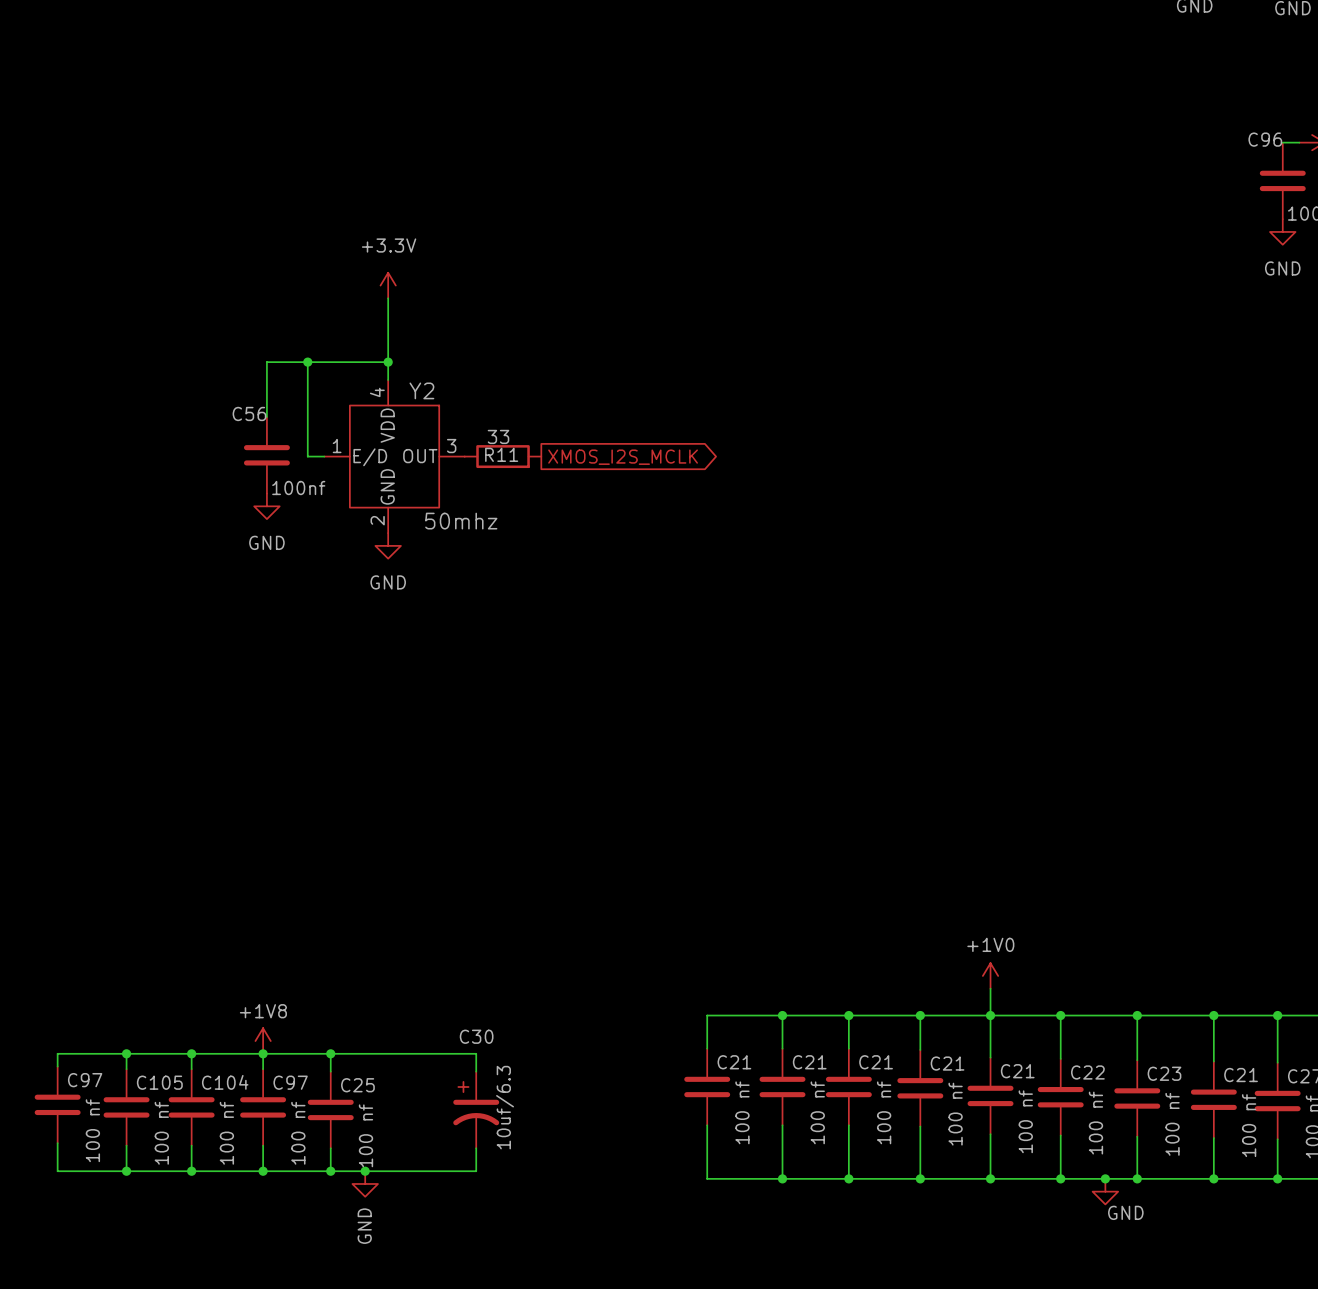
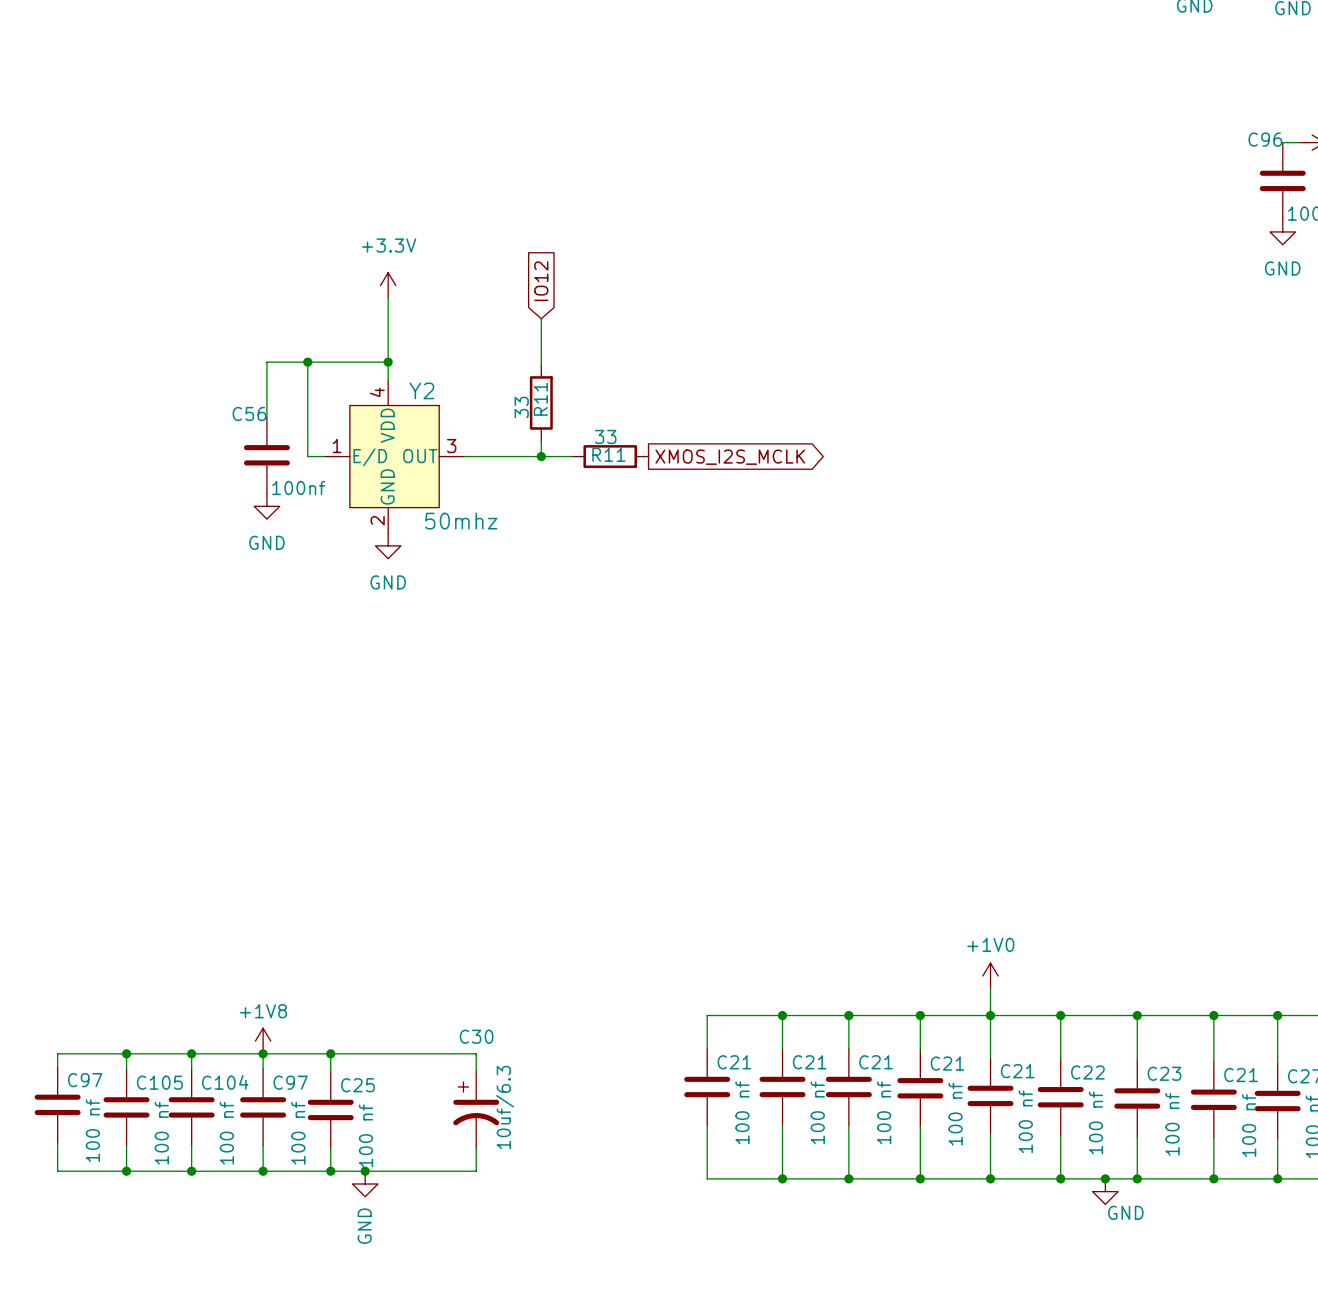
global label: none -> IO12 (541, 281)
wire: none -> (541, 318) (541, 364)
R11: none -> 33 (541, 402)
wire: none -> (464, 456) (571, 456)
R11: 33 (503, 456) -> none
junction: none -> (541, 456)
R11: none -> 33 (610, 456)
global label position: XMOS_I2S_MCLK (623, 457) -> XMOS_I2S_MCLK (730, 457)

